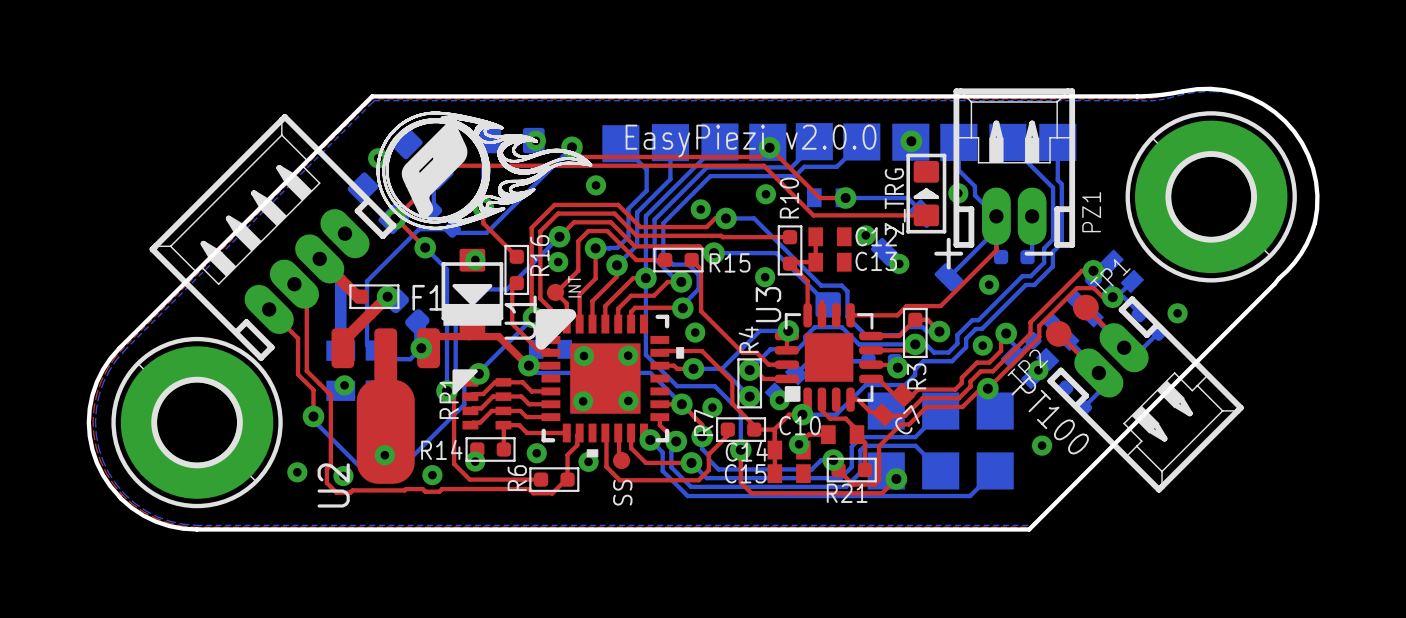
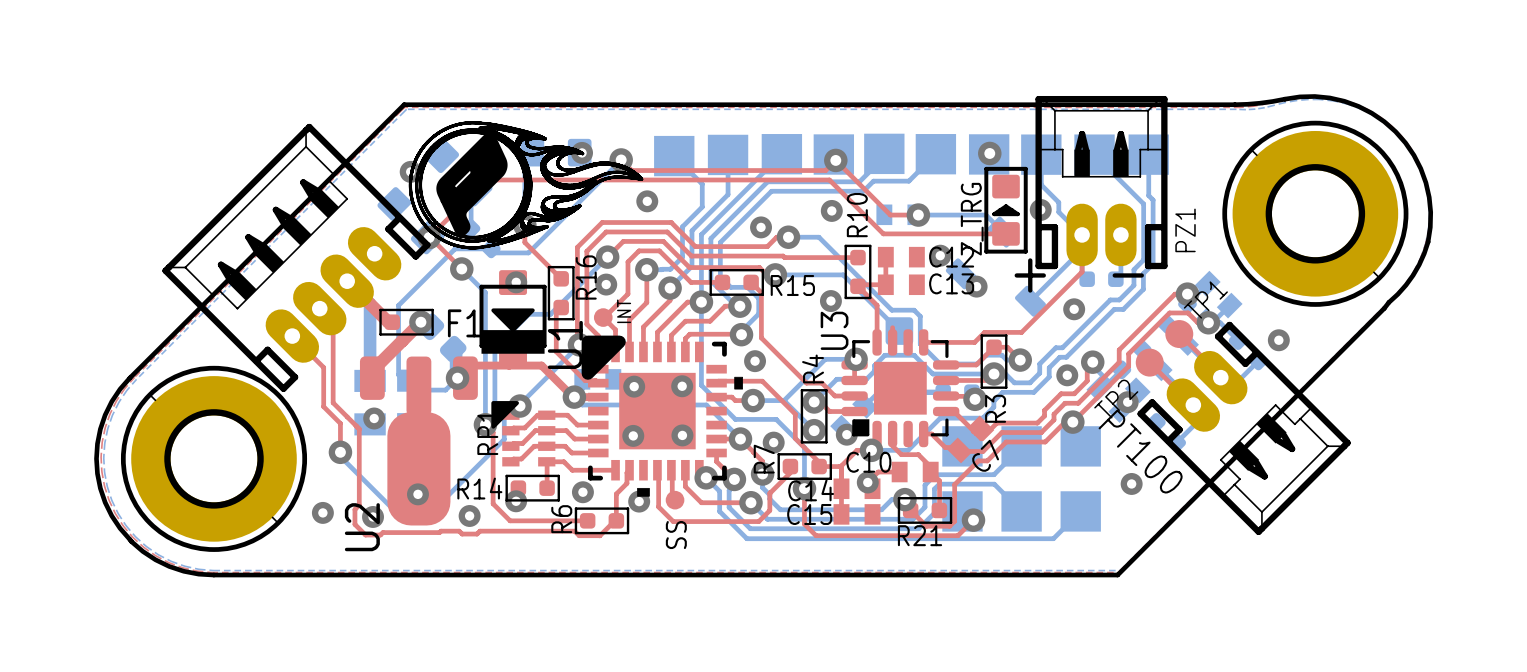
text: EasyPiezi v2.0.0 (751, 141) -> none

